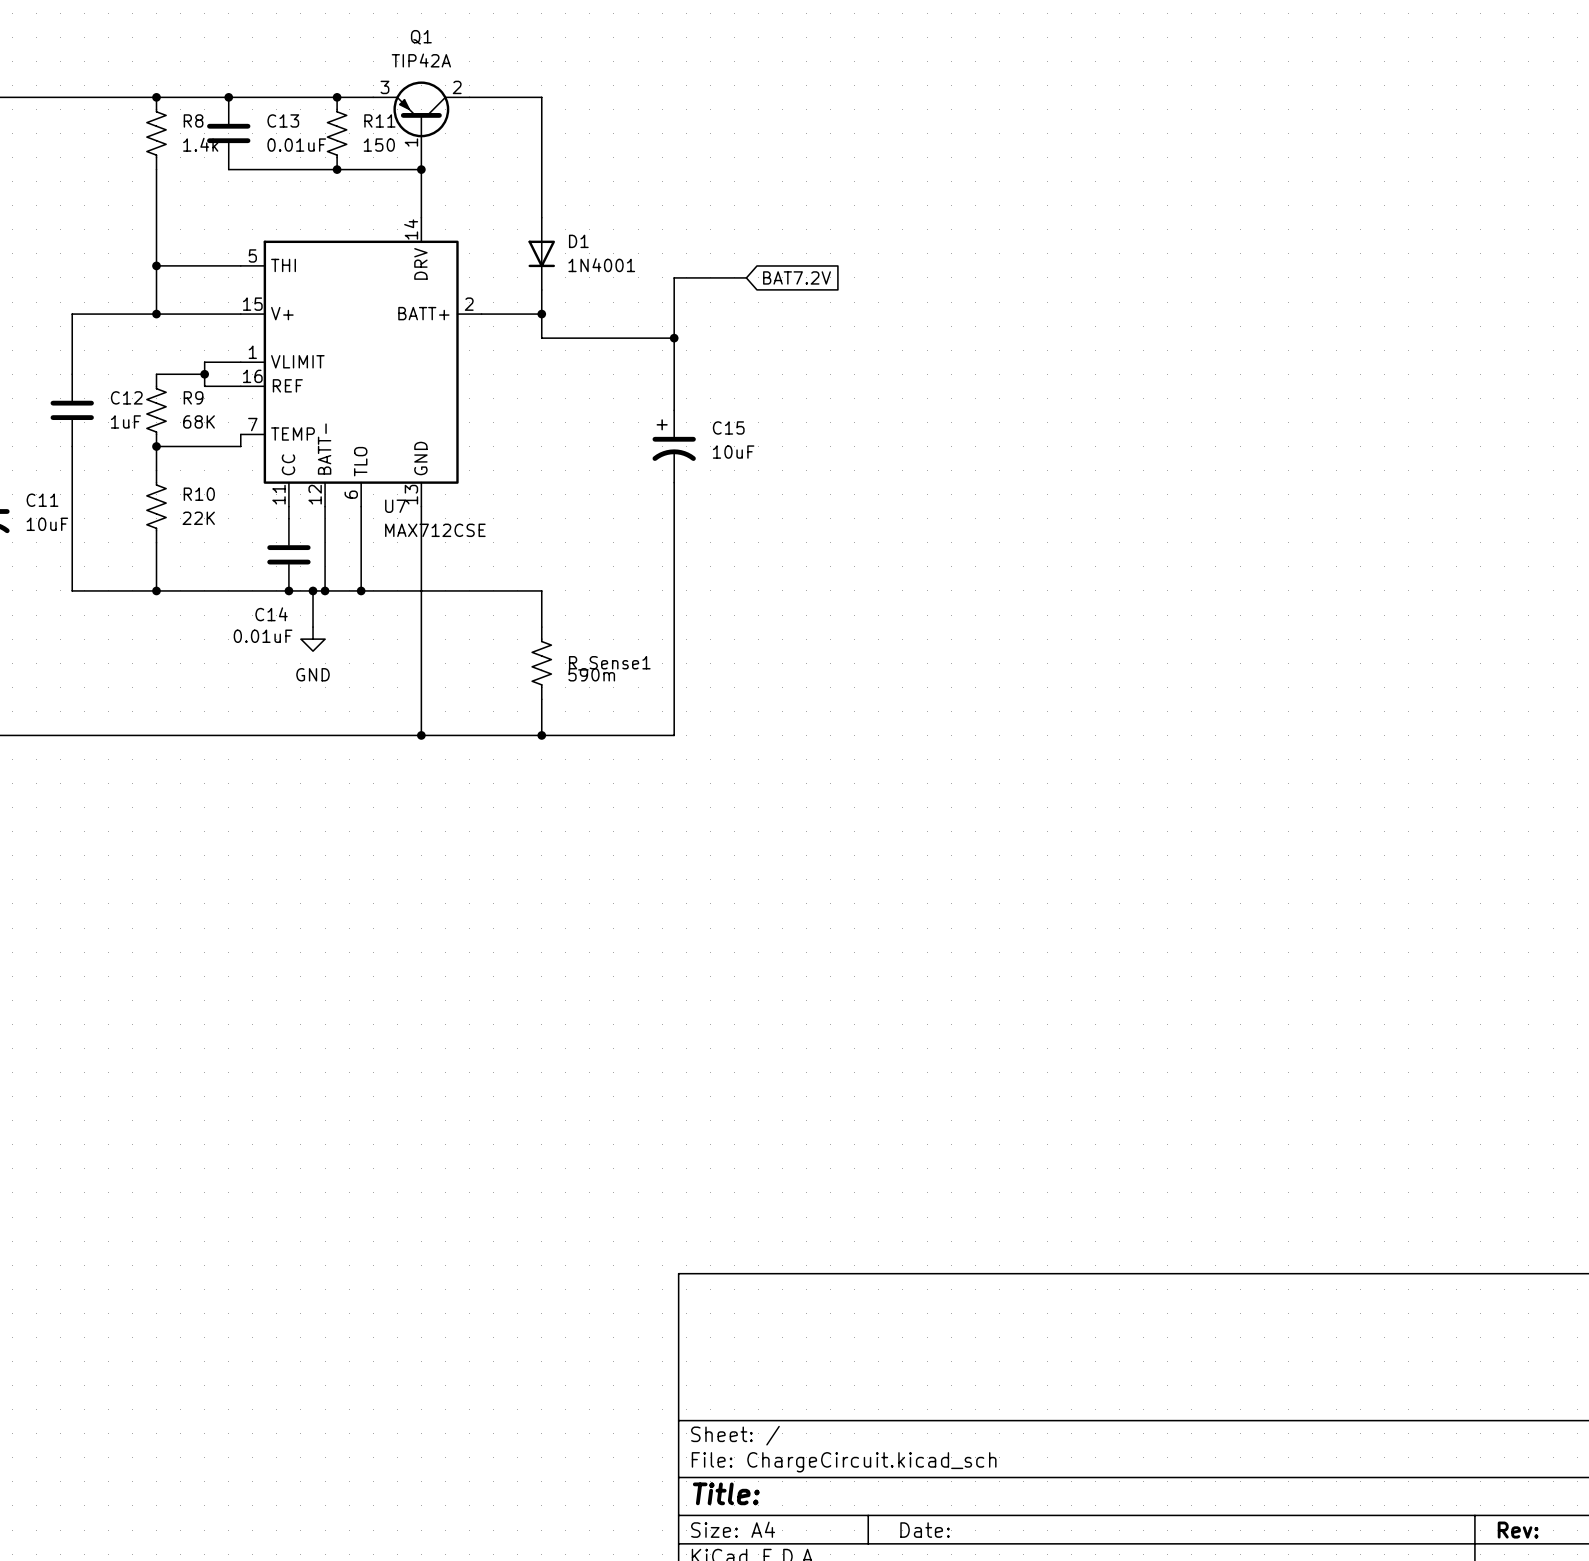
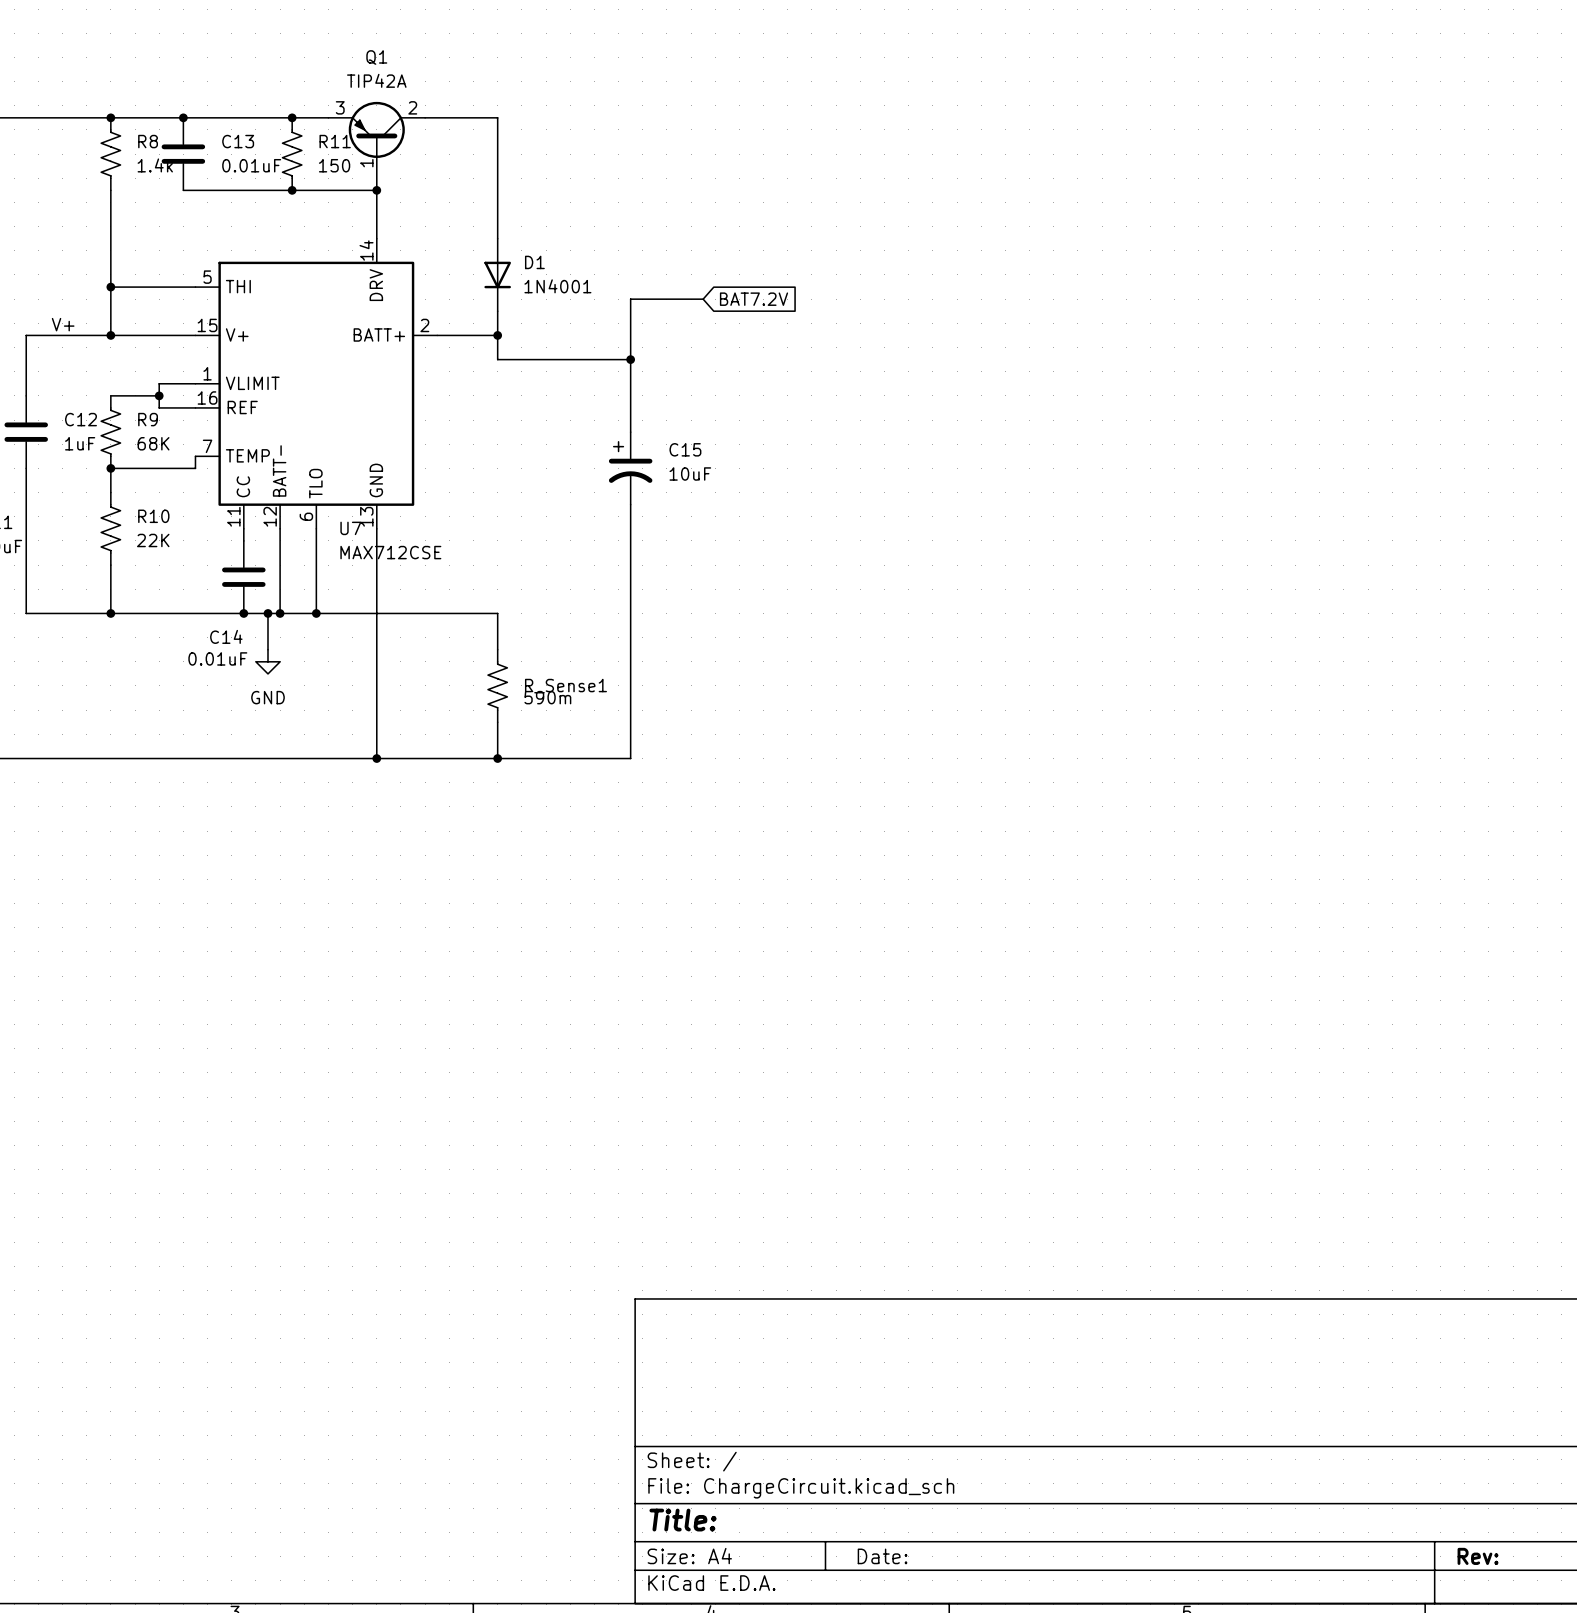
label: none -> V+ (63, 324)

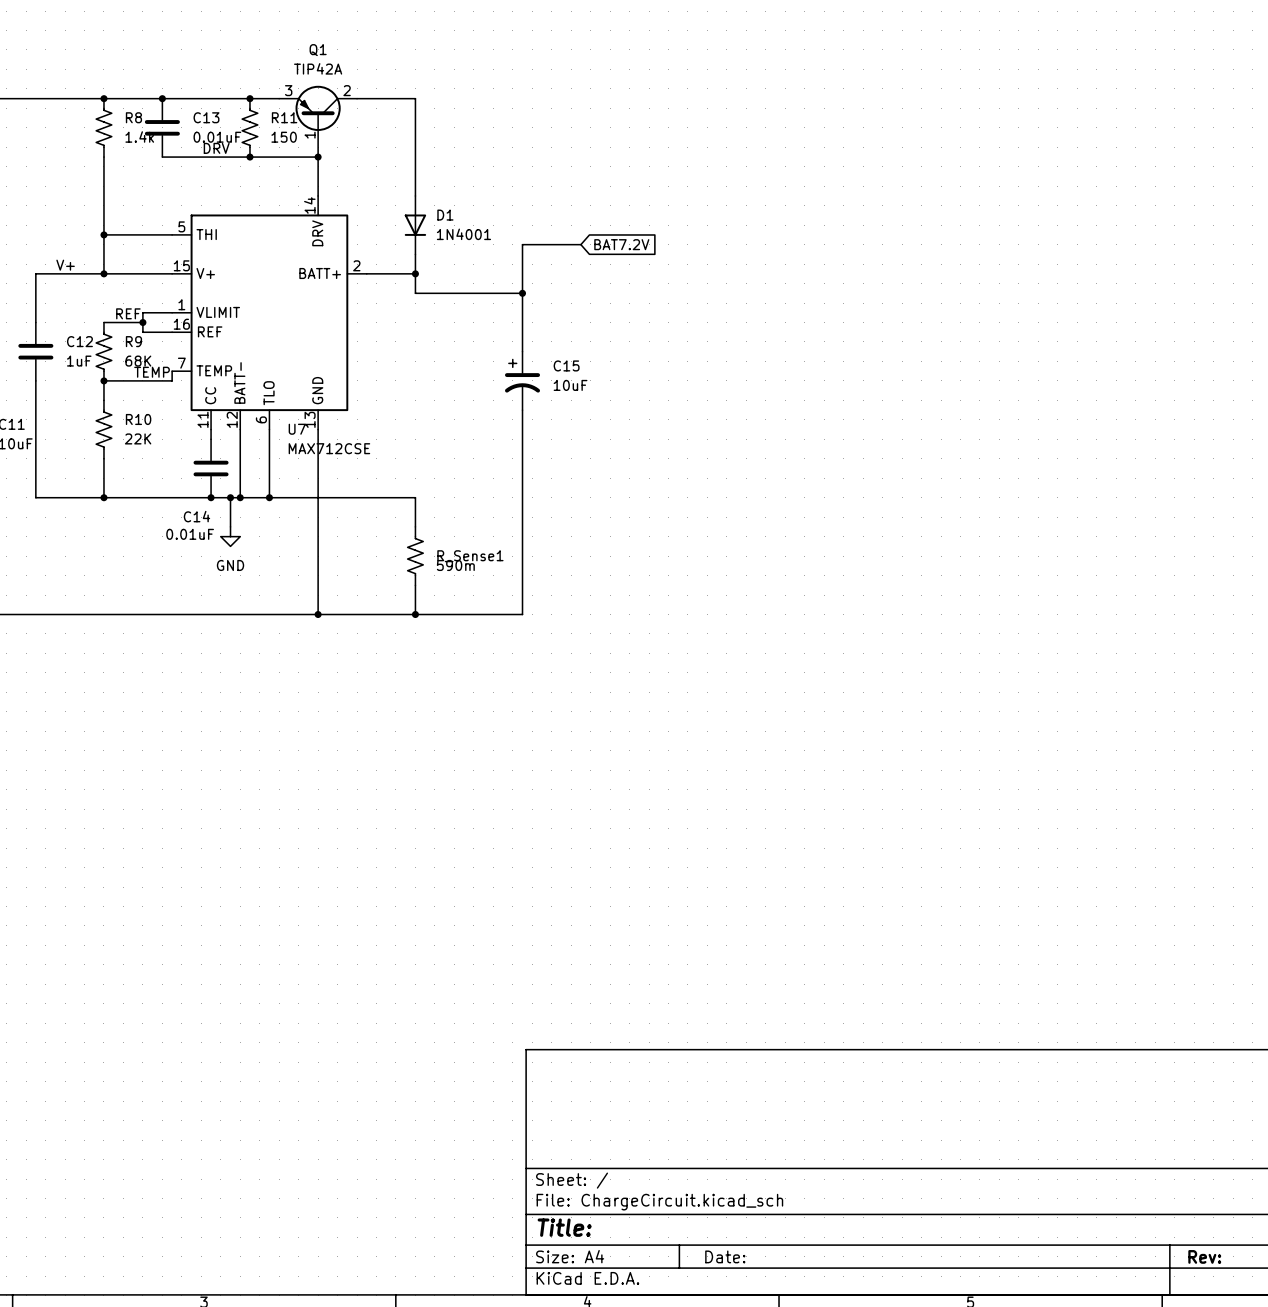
label: none -> DRV (216, 148)
label: none -> REF (128, 313)
label: none -> TEMP (152, 372)

